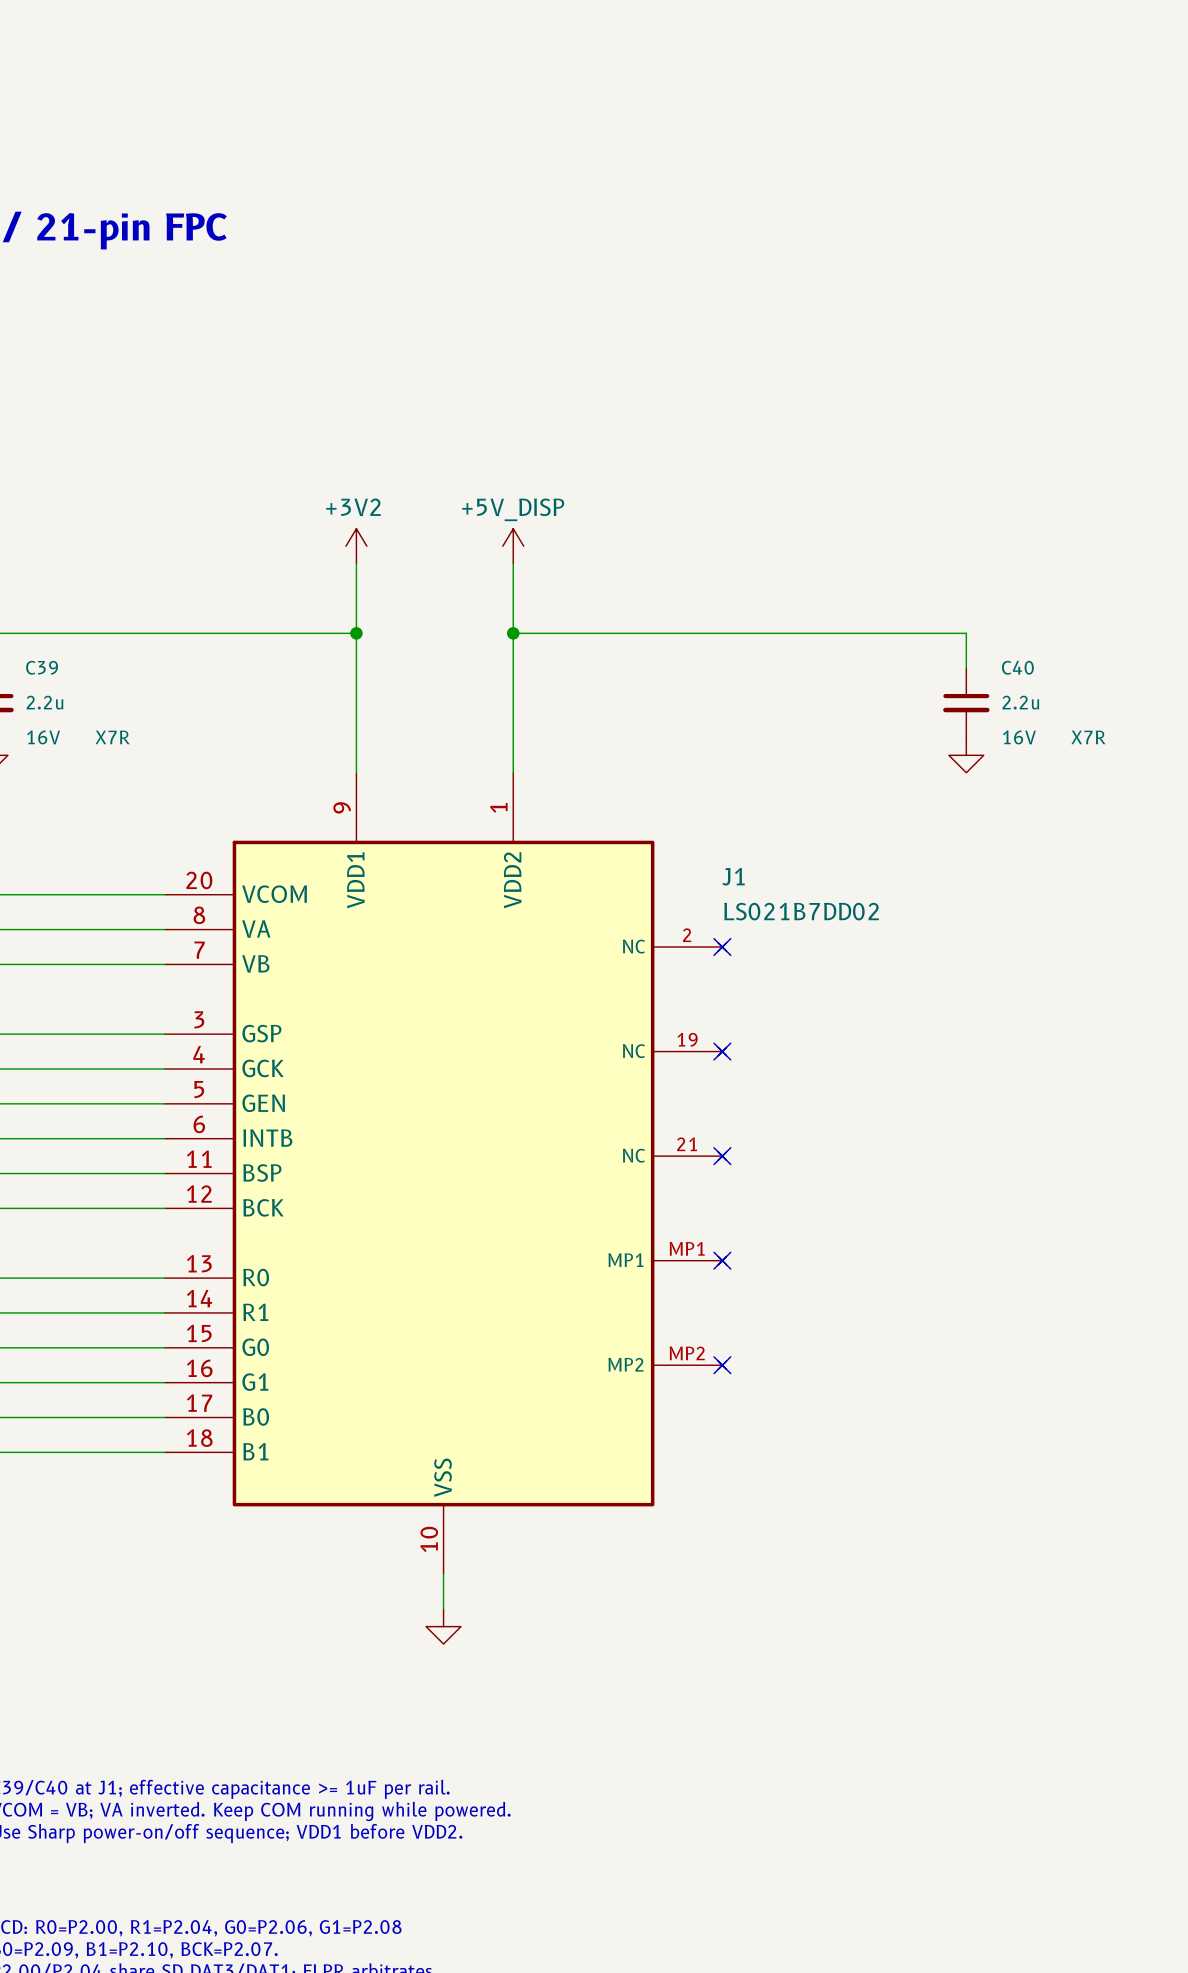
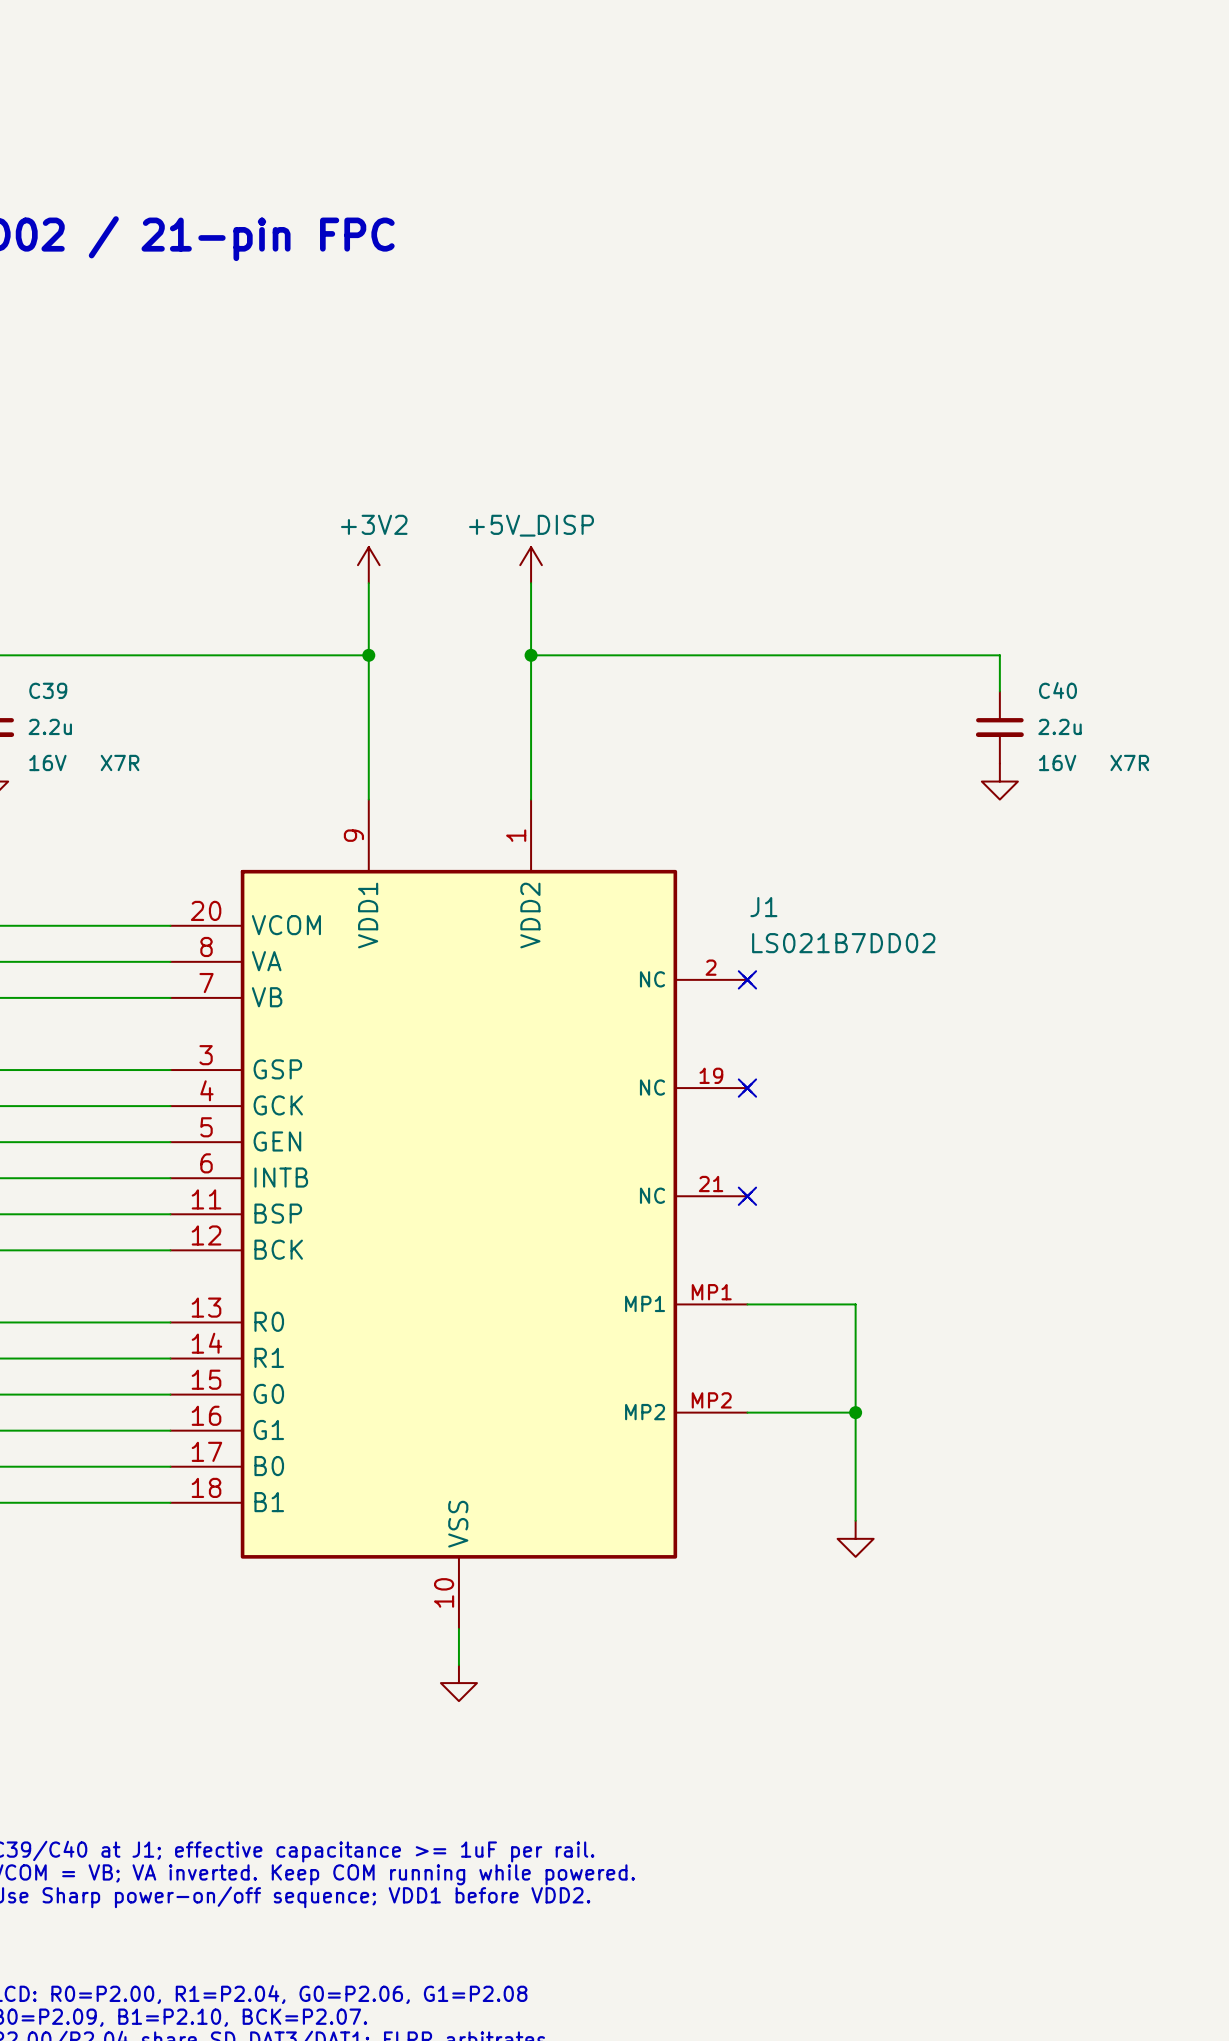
J1 symbol: [164, 772, 727, 1575] -> [170, 799, 752, 1629]
wire: none -> (747, 1304) (855, 1304) (855, 1520)
no-connect mark: (722, 1260) -> none
wire: none -> (747, 1412) (855, 1412)
no-connect mark: (722, 1365) -> none
junction: none -> (855, 1412)
power symbol: none -> (855, 1538)

